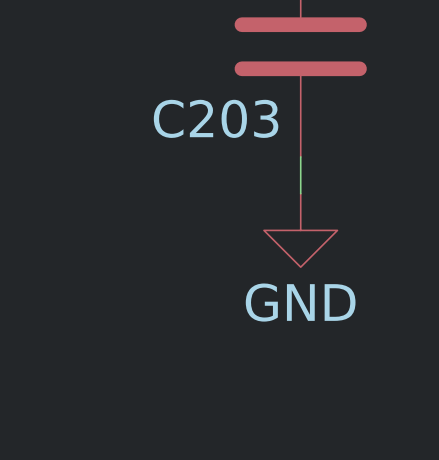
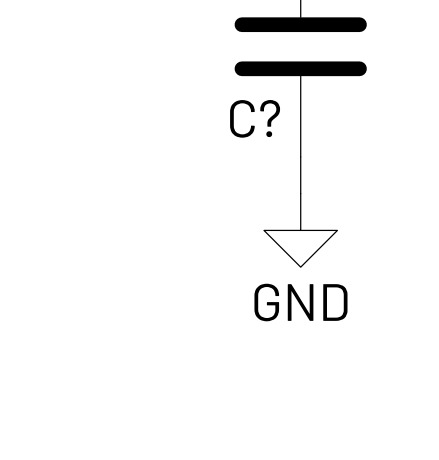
C203 name: C203 (216, 118) -> C? (255, 118)

